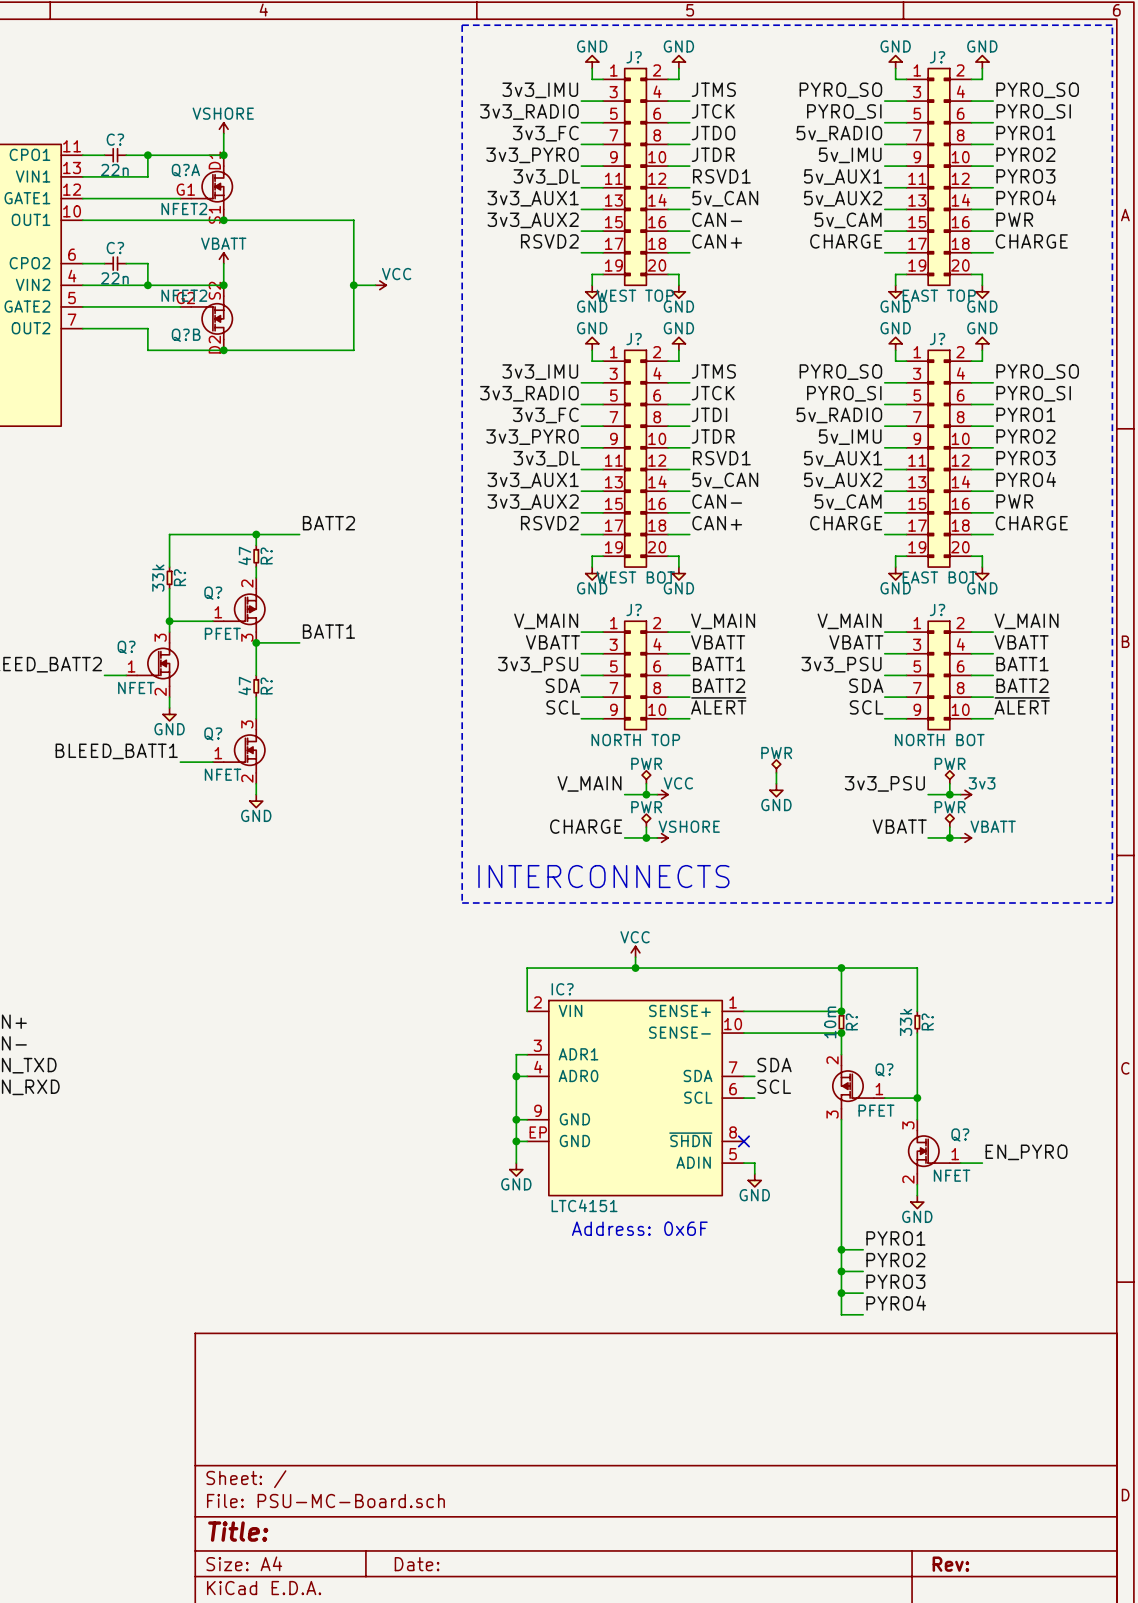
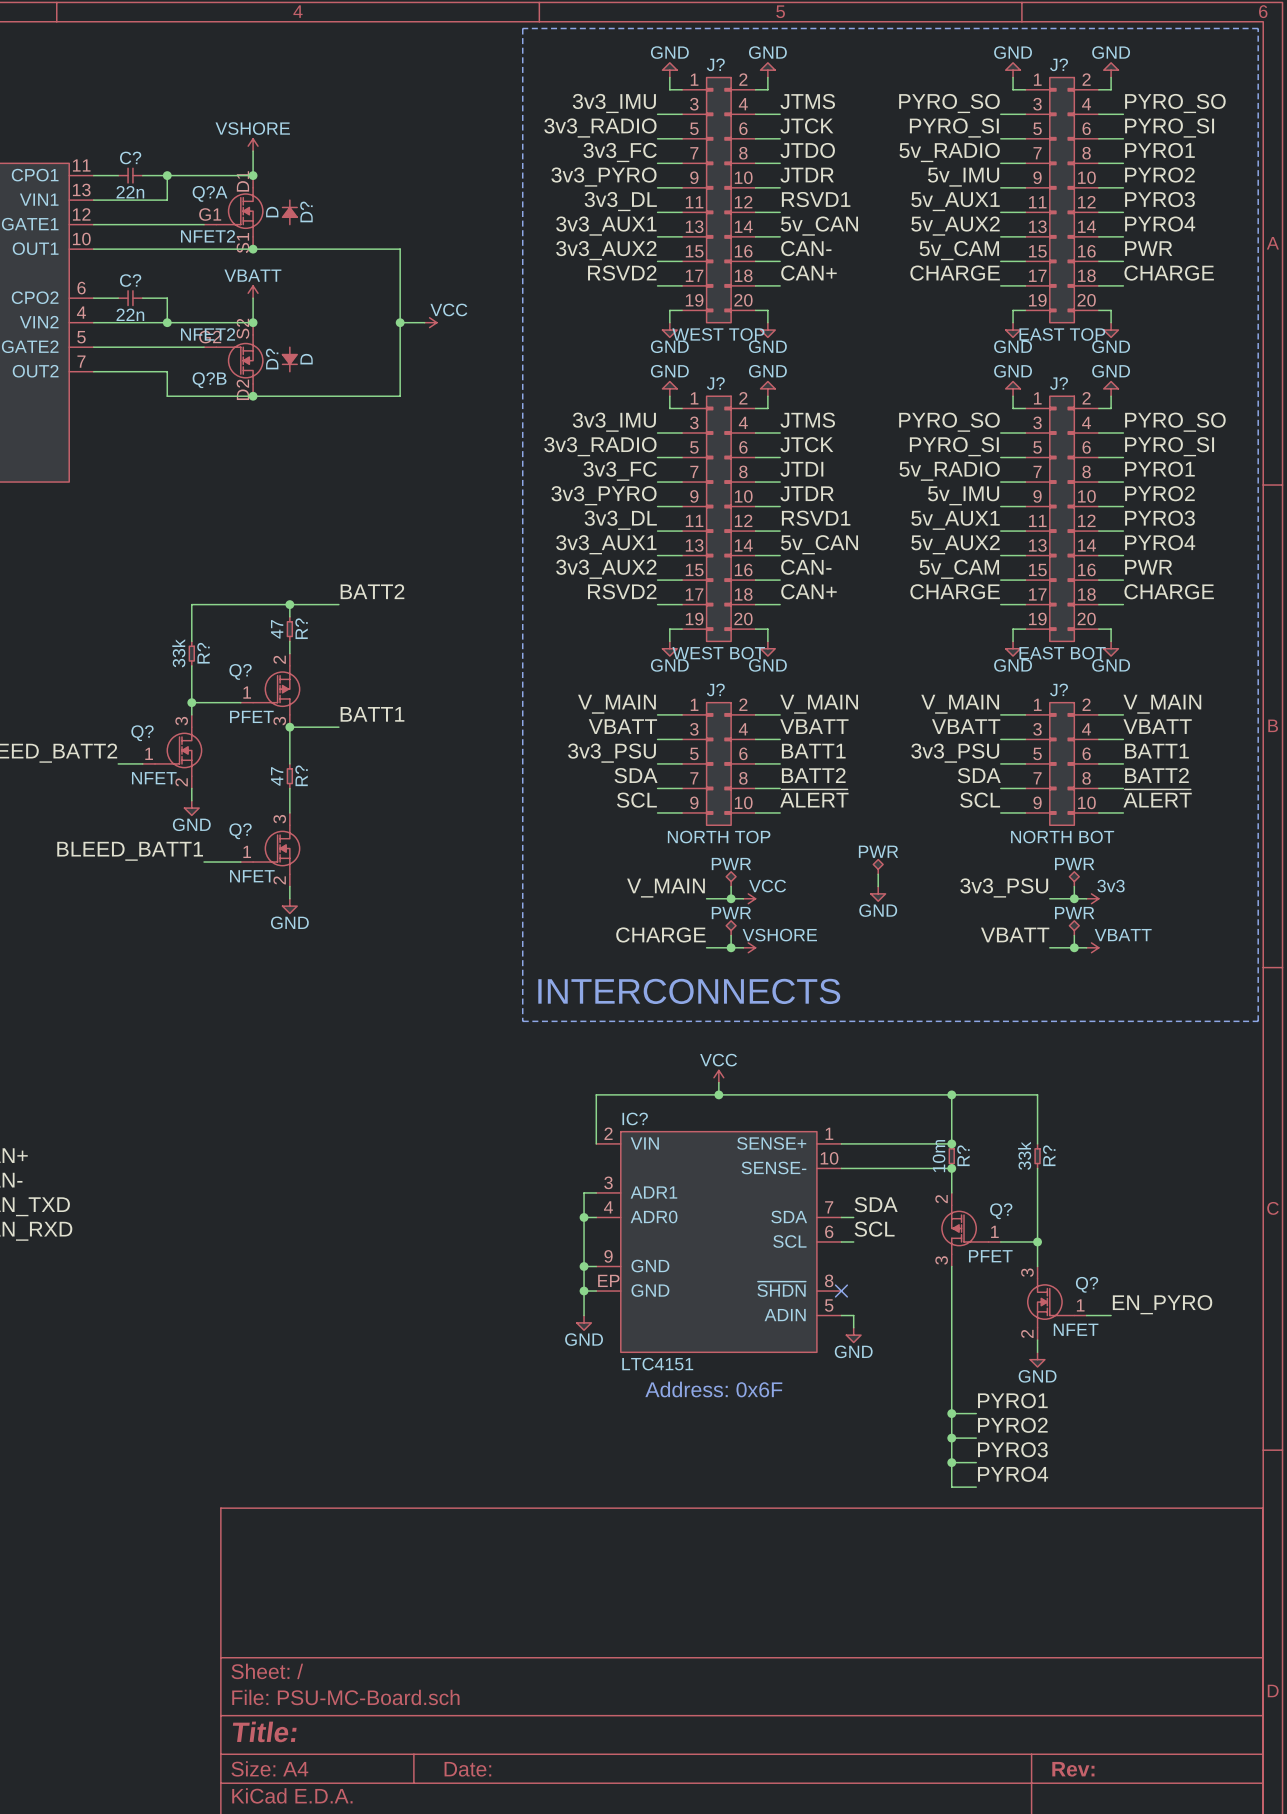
D?: none -> D (289, 212)
D?: none -> D (289, 359)

